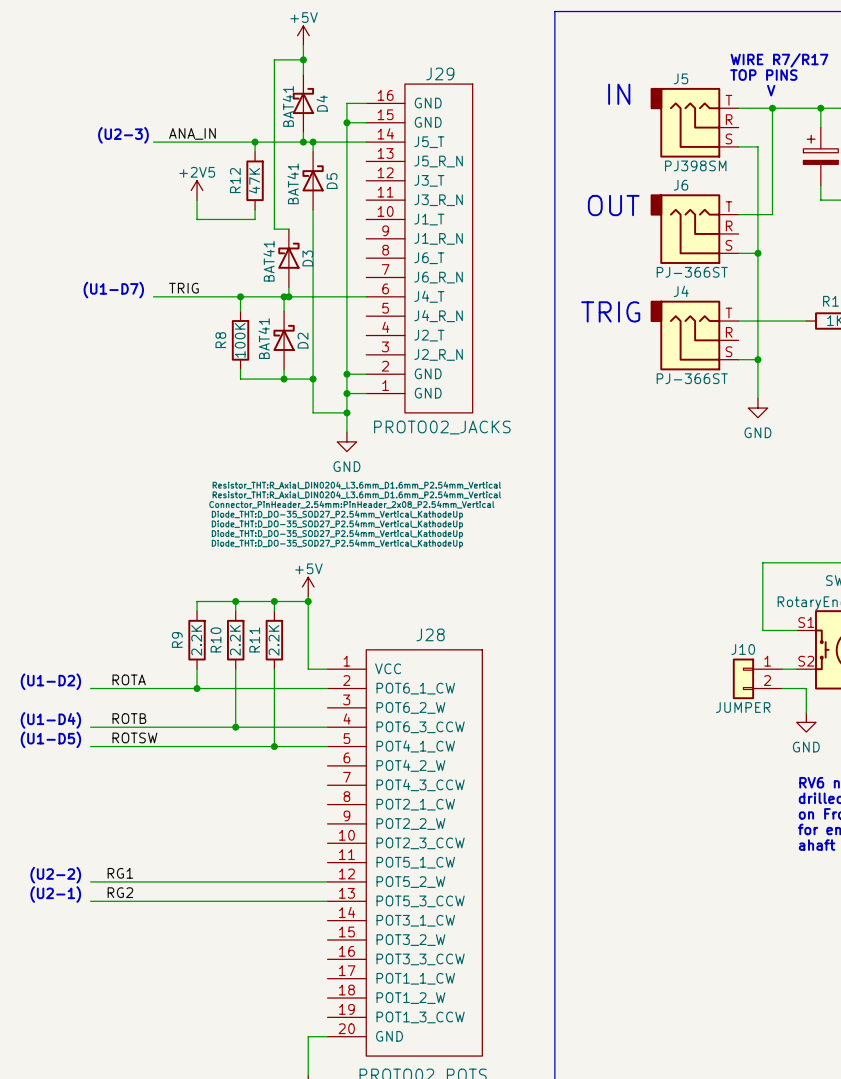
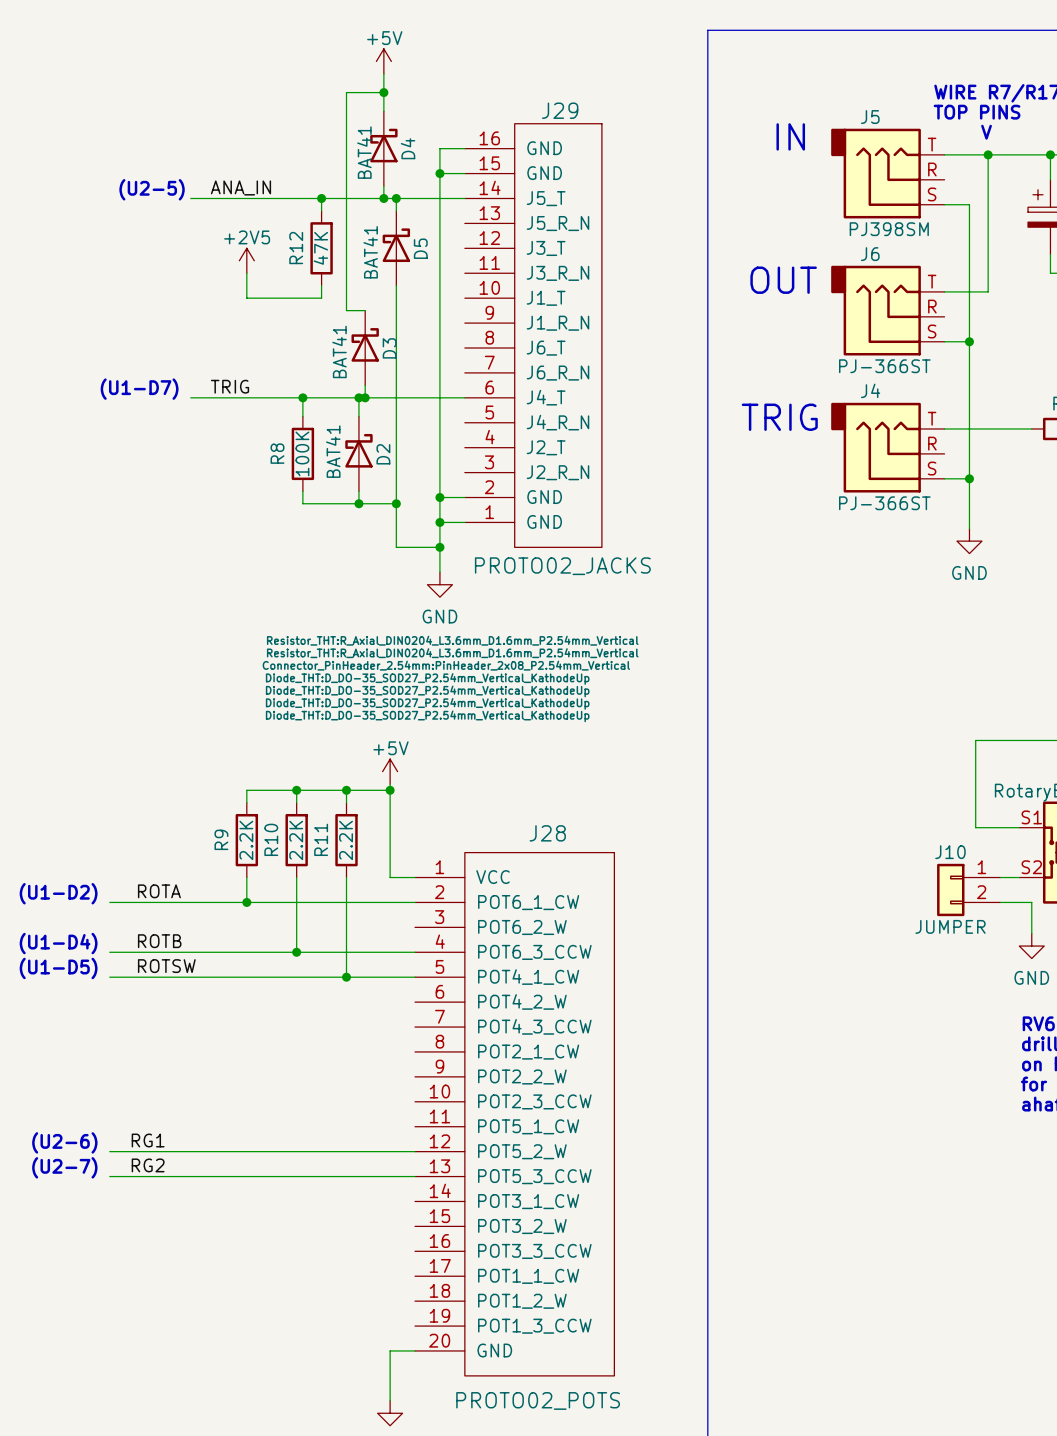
text: (U2-3) (123, 135) -> (U2-5) (152, 189)
text: (U2-2) (55, 875) -> (U2-6) (64, 1142)
text: (U2-1) (55, 894) -> (U2-7) (64, 1167)

